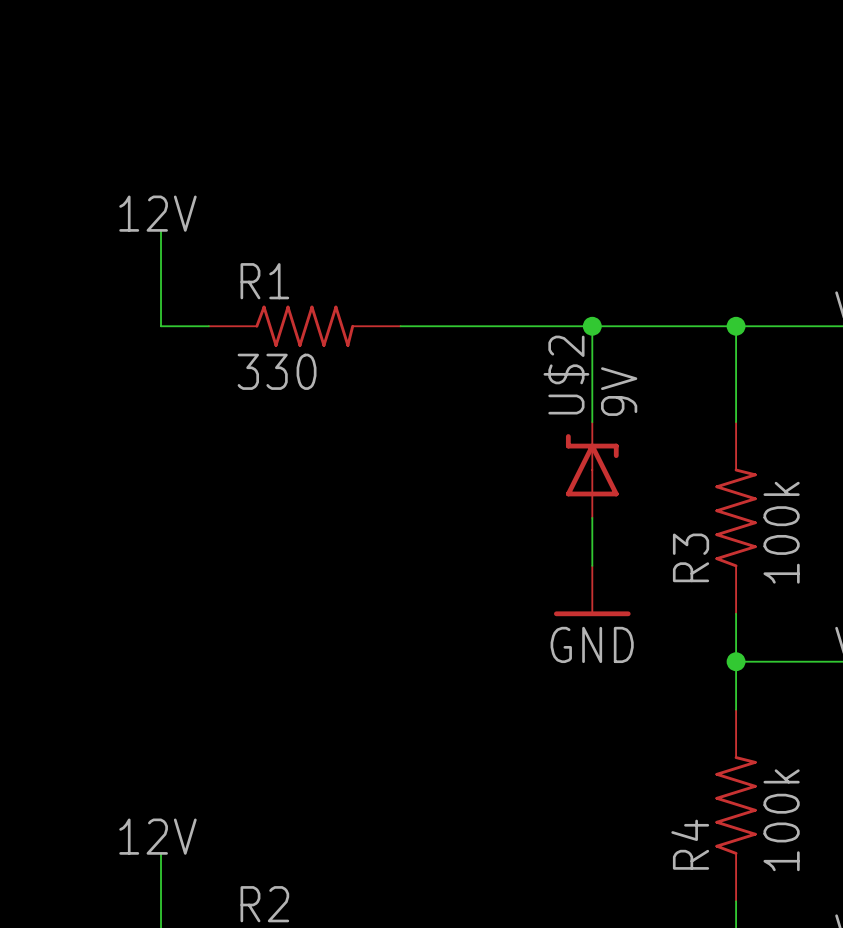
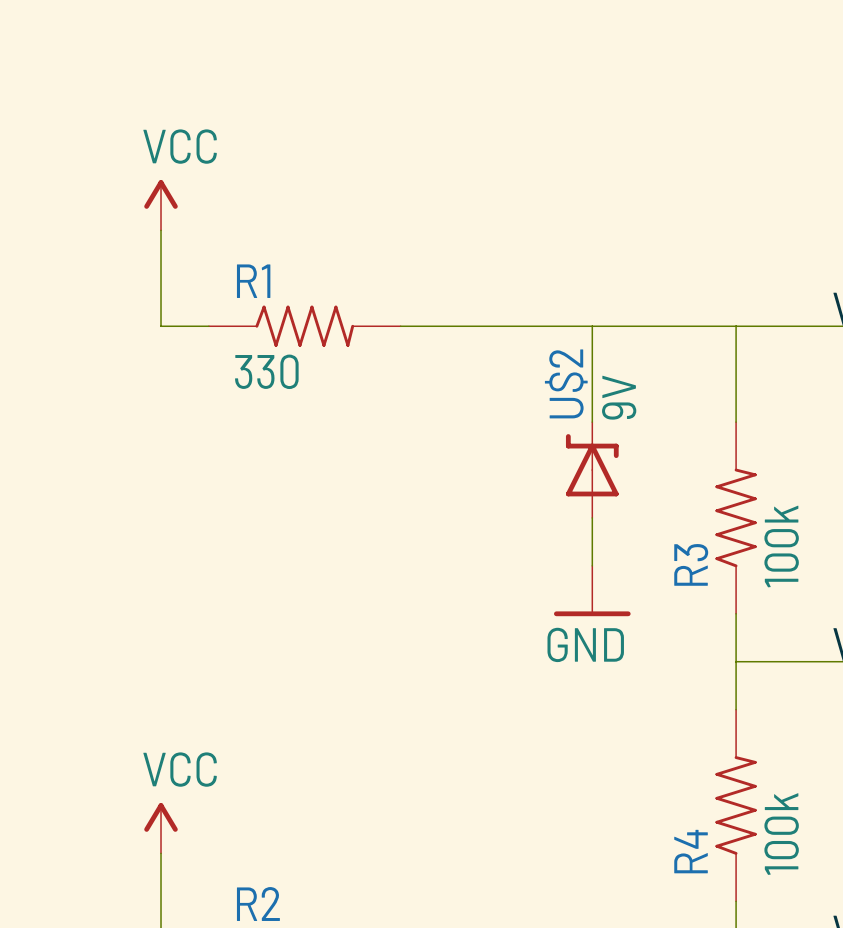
power symbol: none -> VCC (161, 205)
label: 12V (157, 213) -> none
junction: (592, 326) -> none
junction: (736, 326) -> none
junction: (736, 661) -> none
power symbol: none -> VCC (161, 828)
label: 12V (157, 836) -> none

